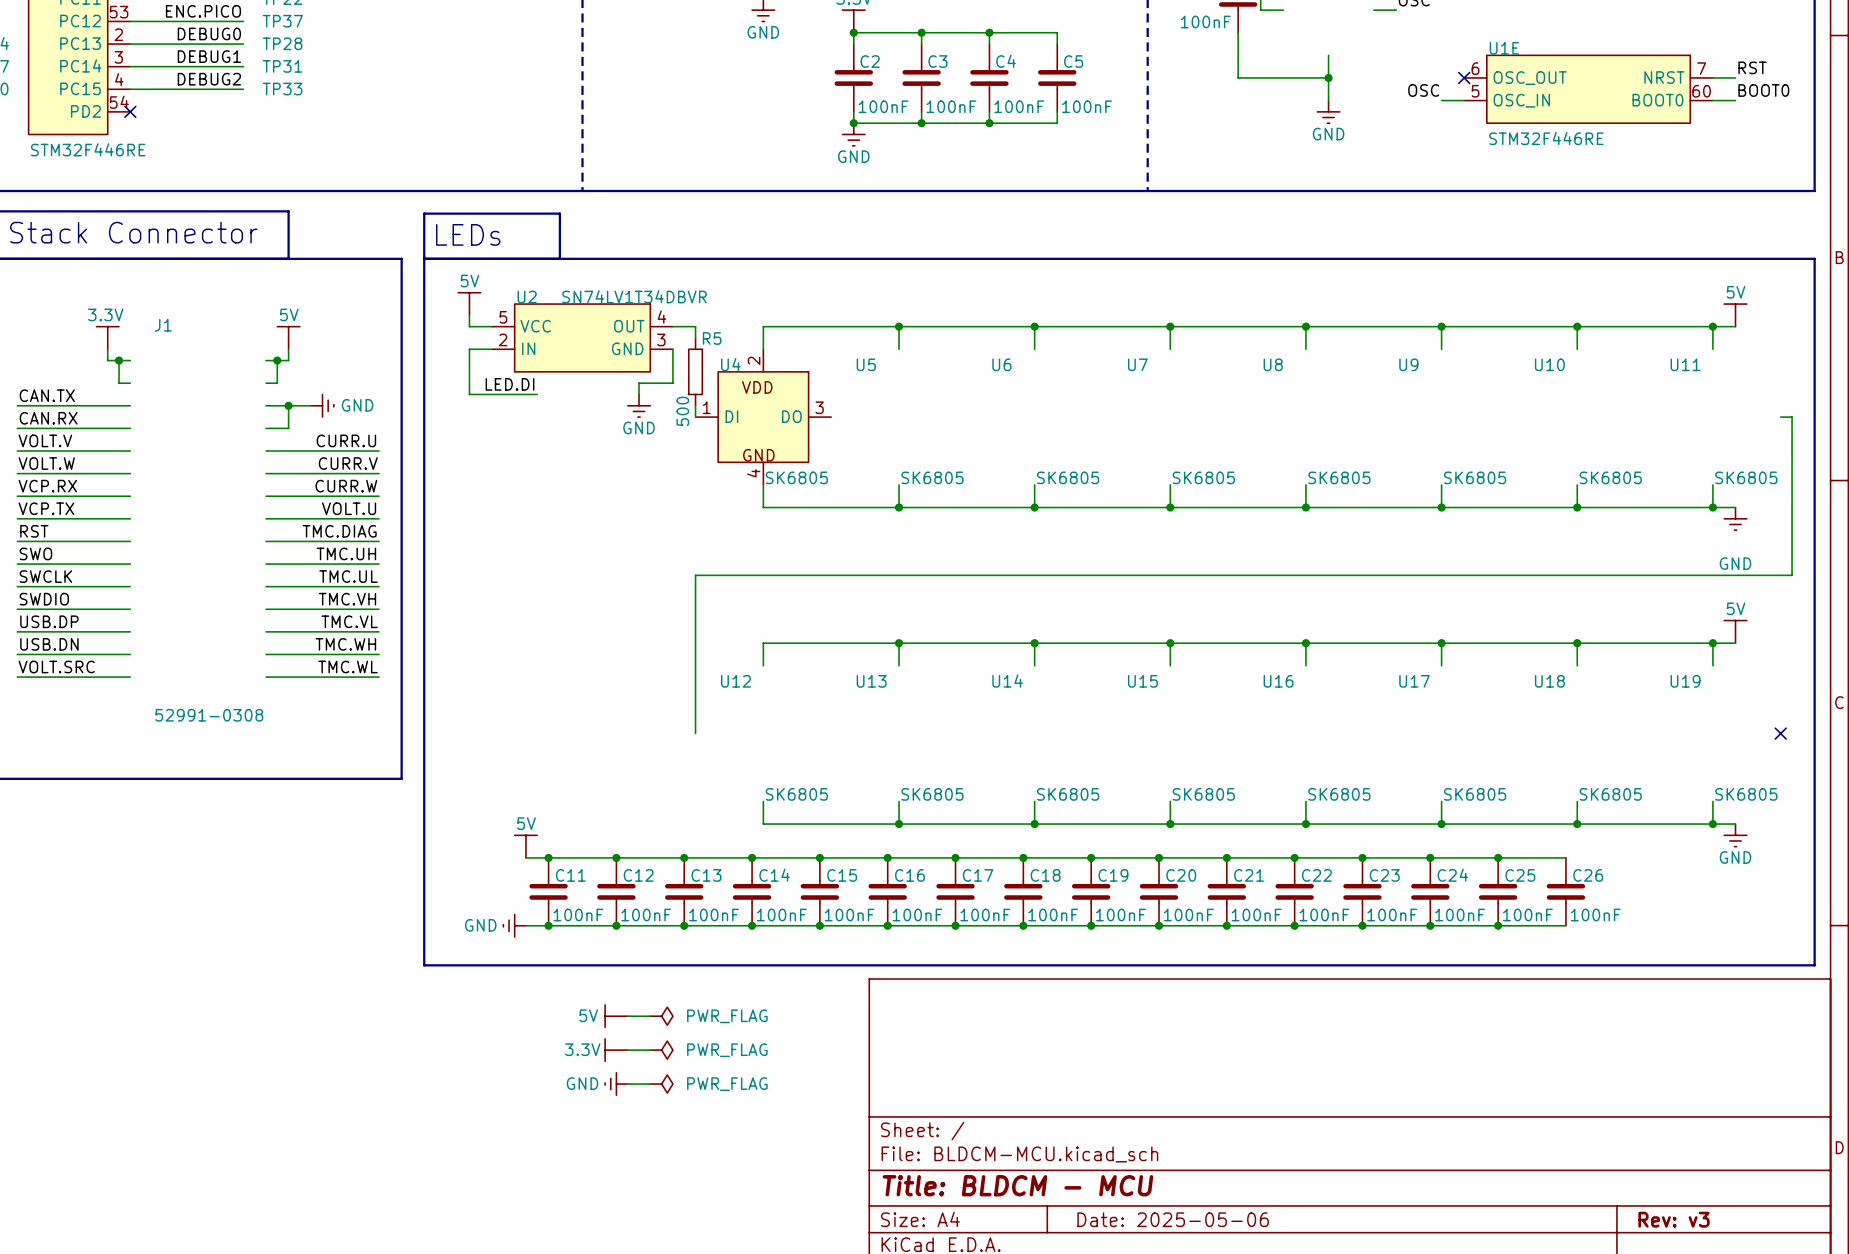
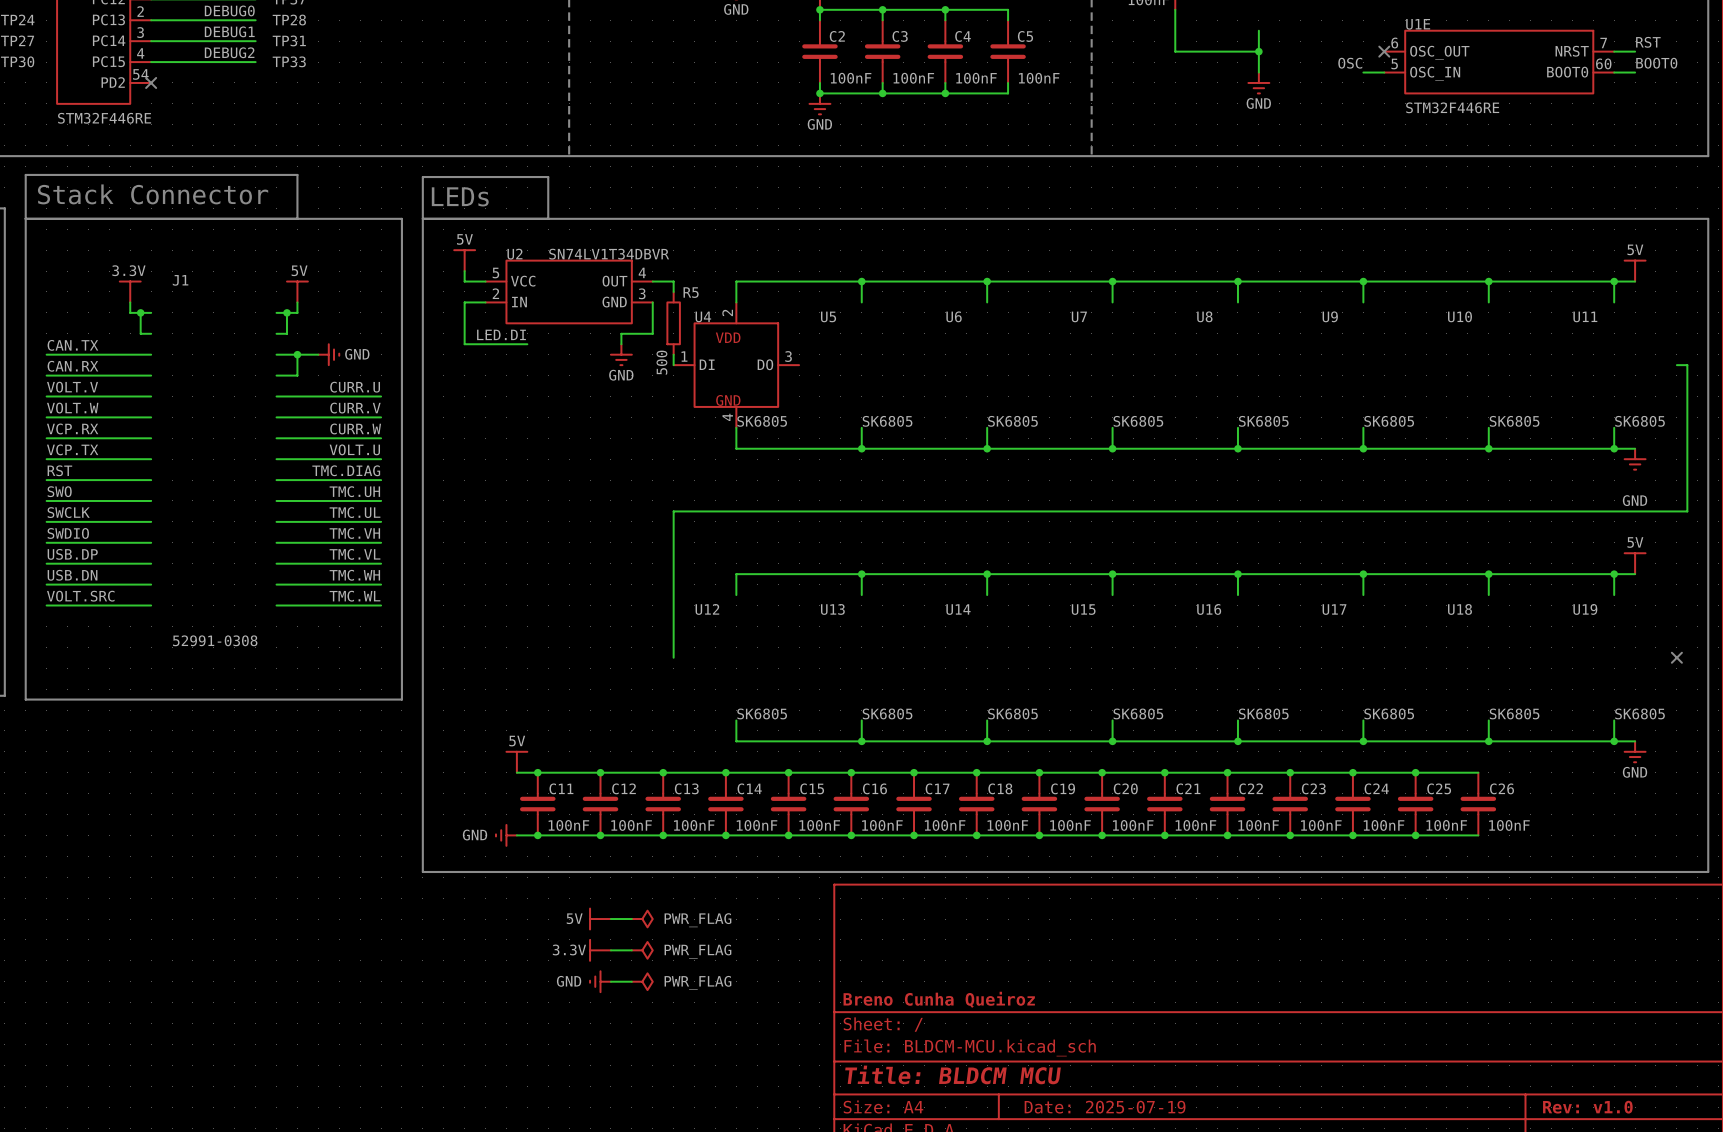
title block: none -> Breno Cunha Queiroz (939, 999)
title block: Title: BLDCM - MCU (1017, 1185) -> Title: BLDCM MCU (953, 1074)
title block: Date: 2025-05-06 (1173, 1219) -> Date: 2025-07-19 (1105, 1107)
title block: Rev: v3 (1674, 1219) -> Rev: v1.0 (1587, 1107)

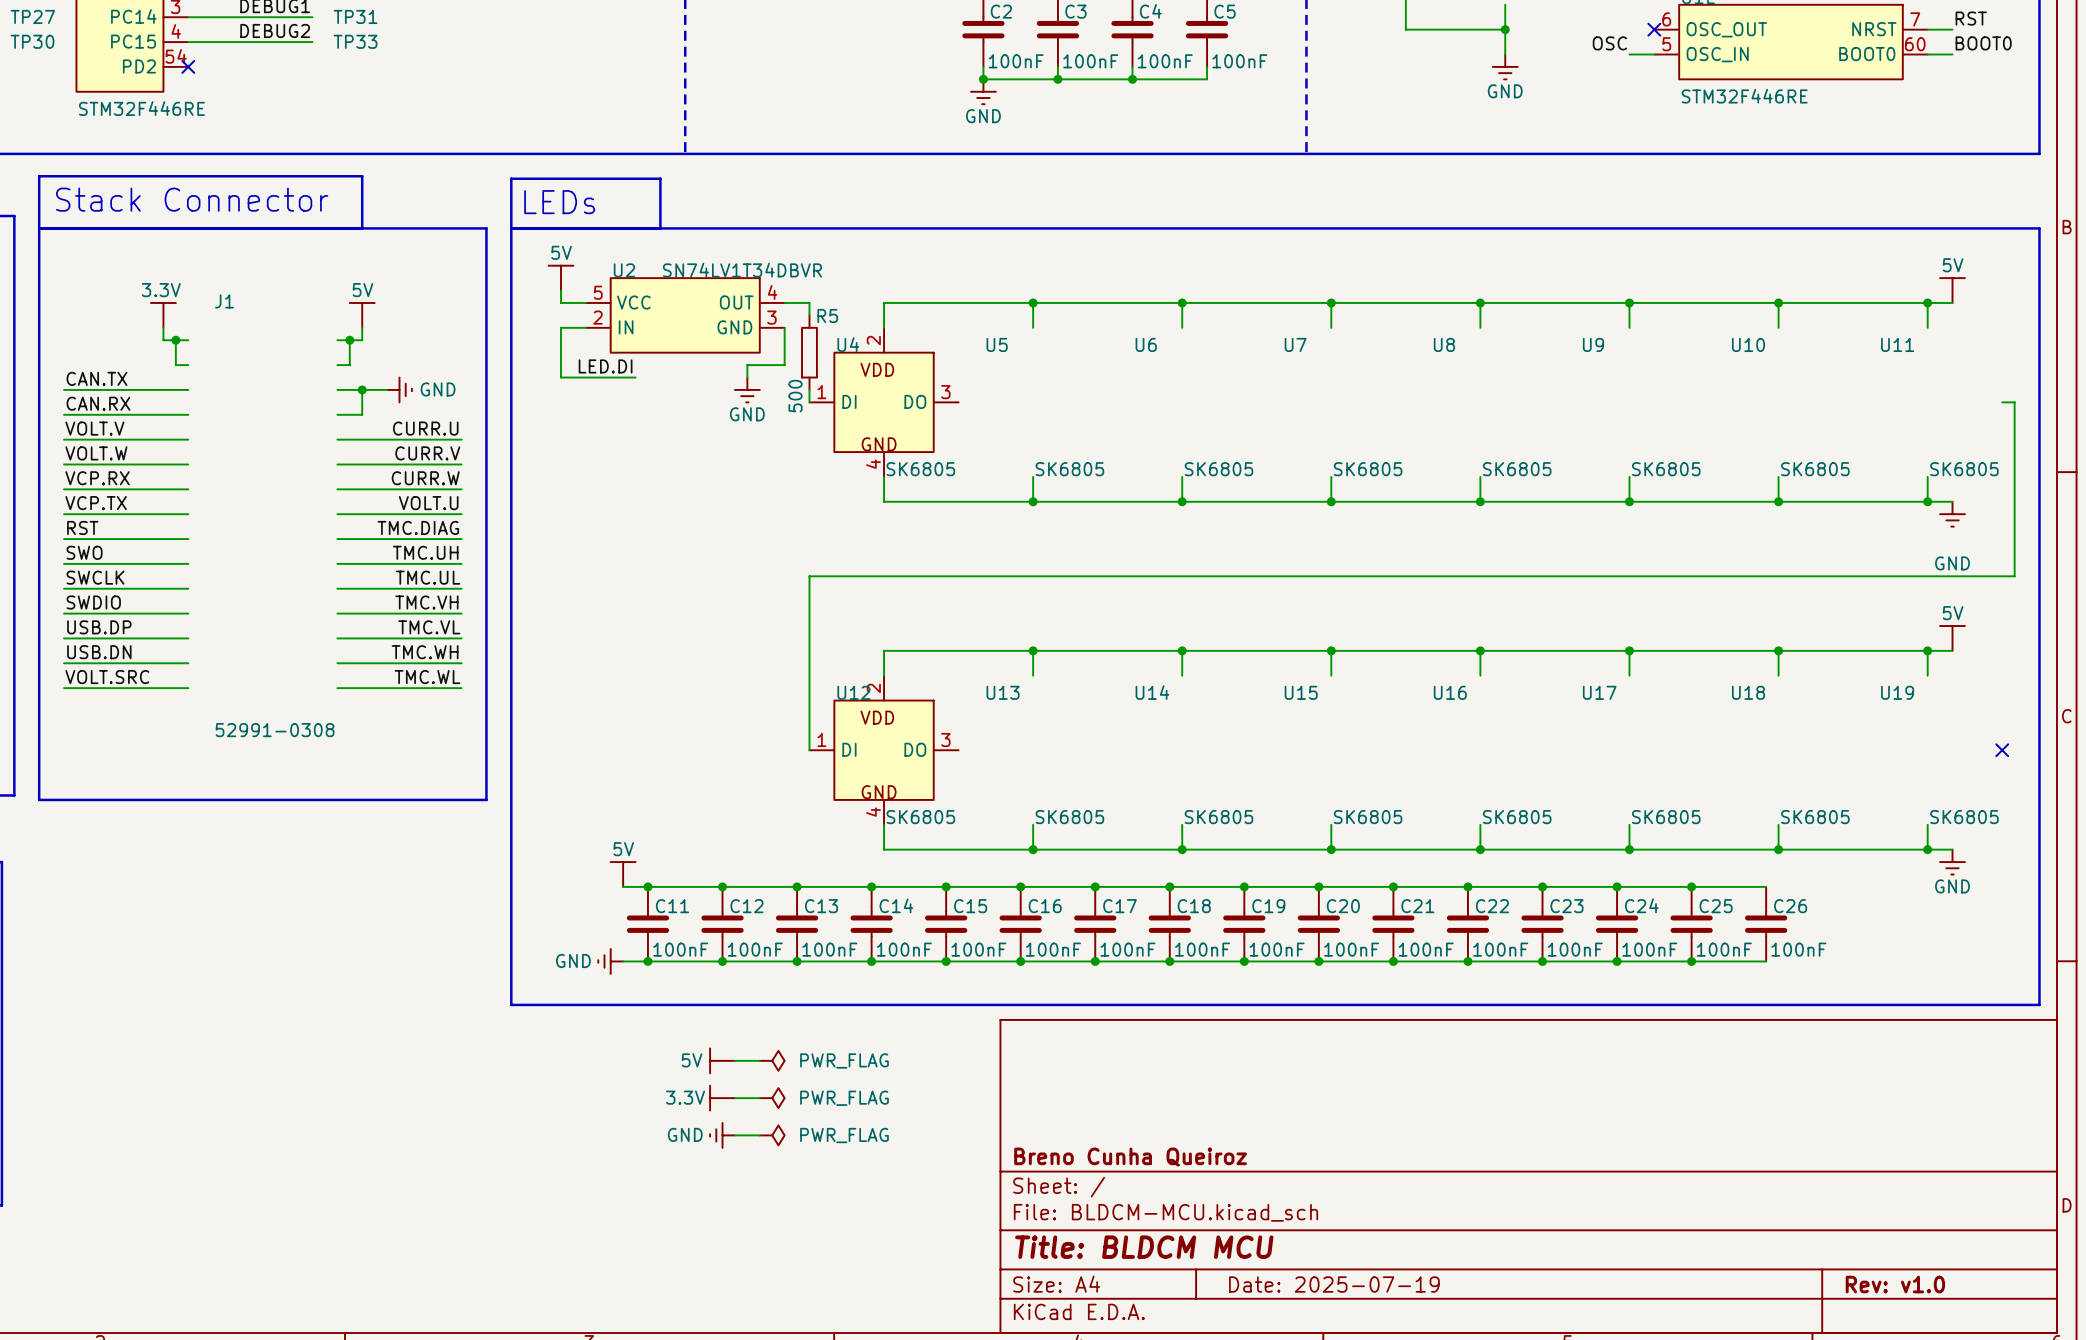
U12 symbol: [695, 604, 787, 720] -> [809, 675, 959, 825]

